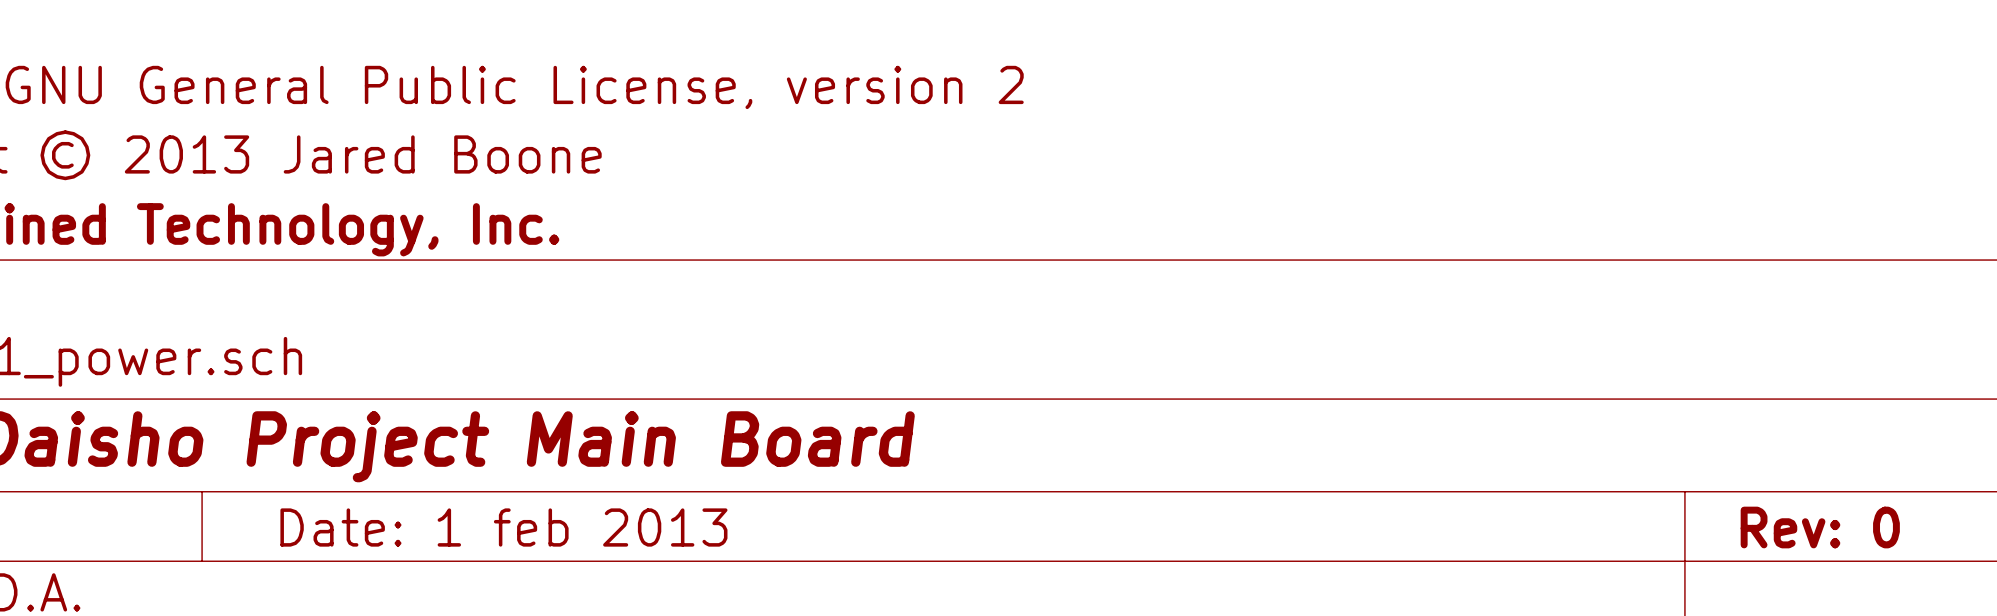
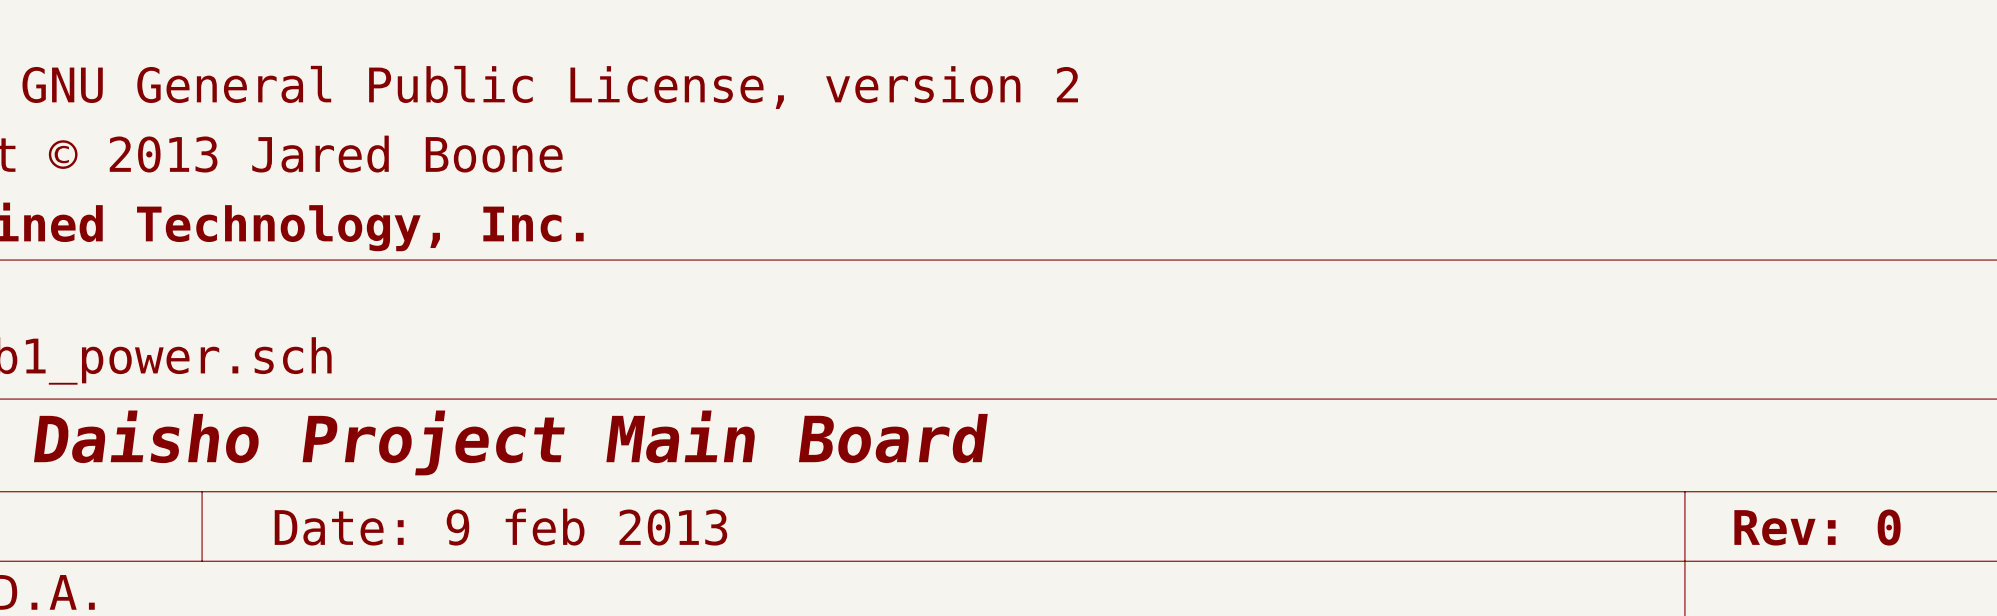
title block: Date: 1 feb 2013 (503, 527) -> Date: 9 feb 2013 (500, 527)

